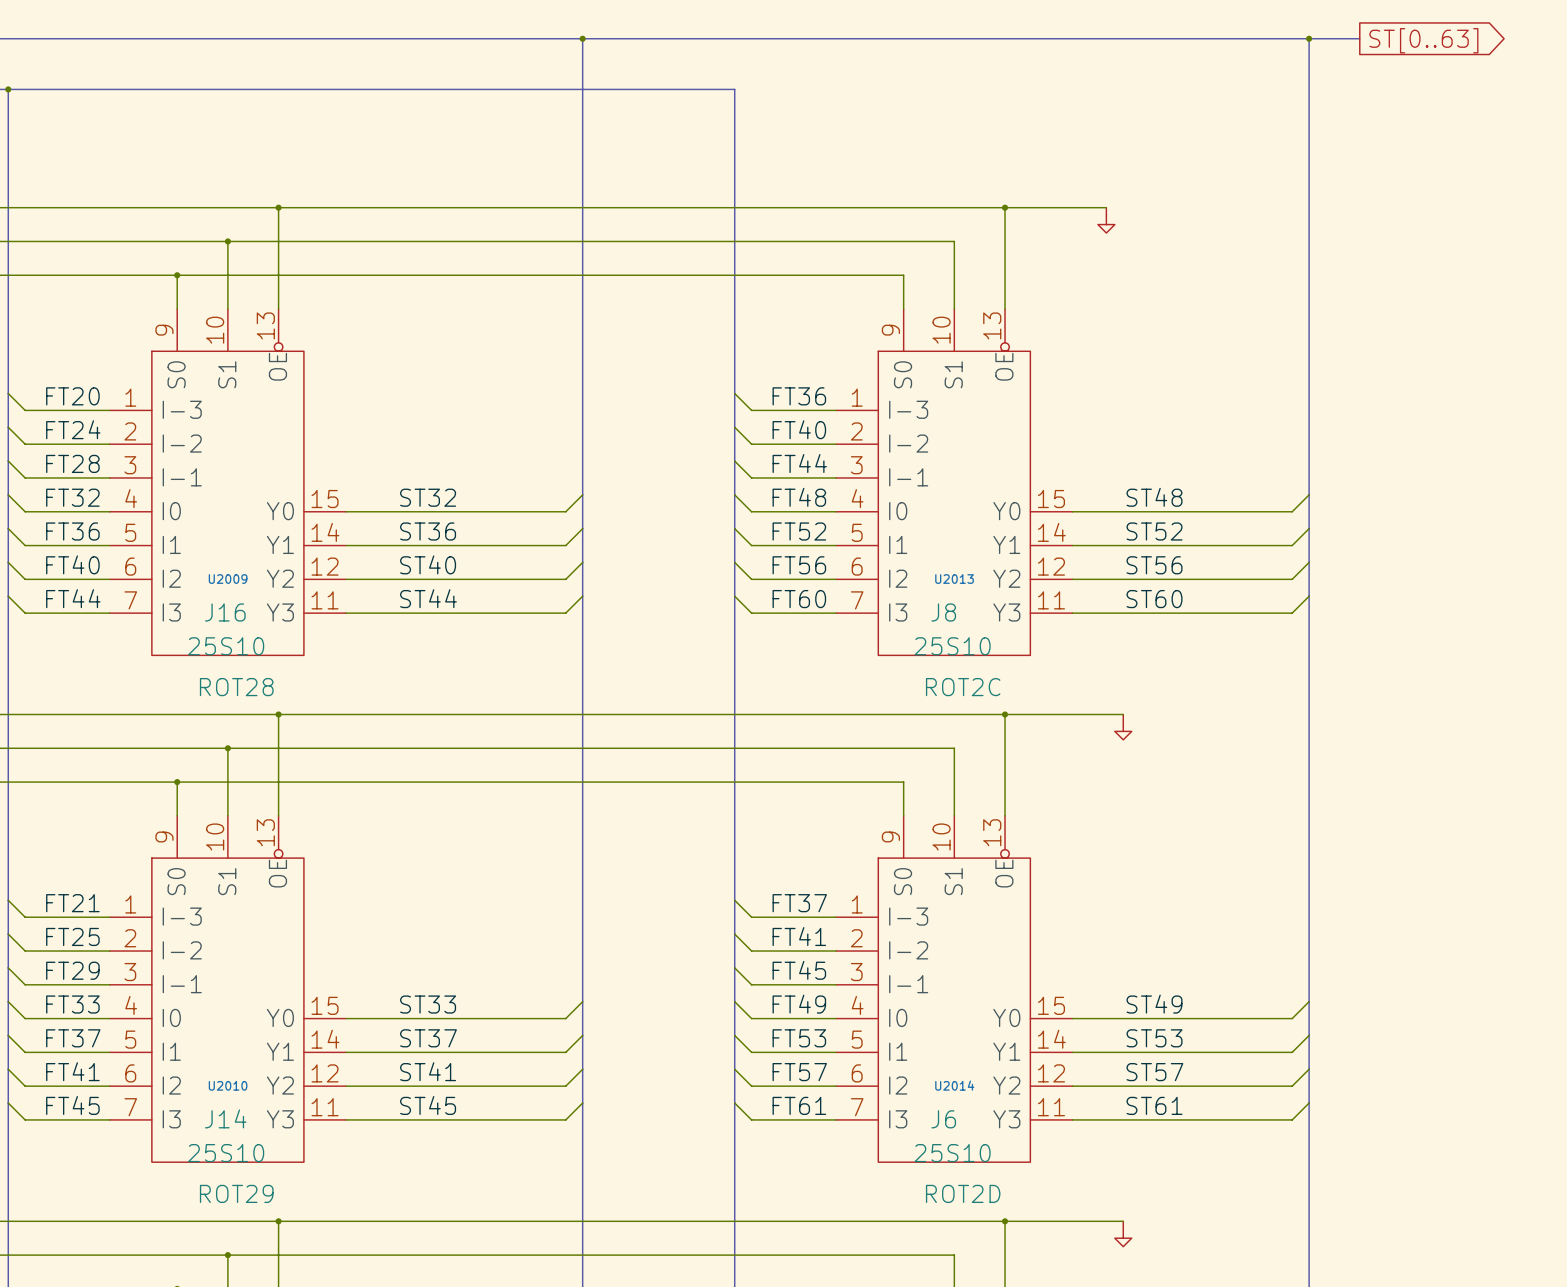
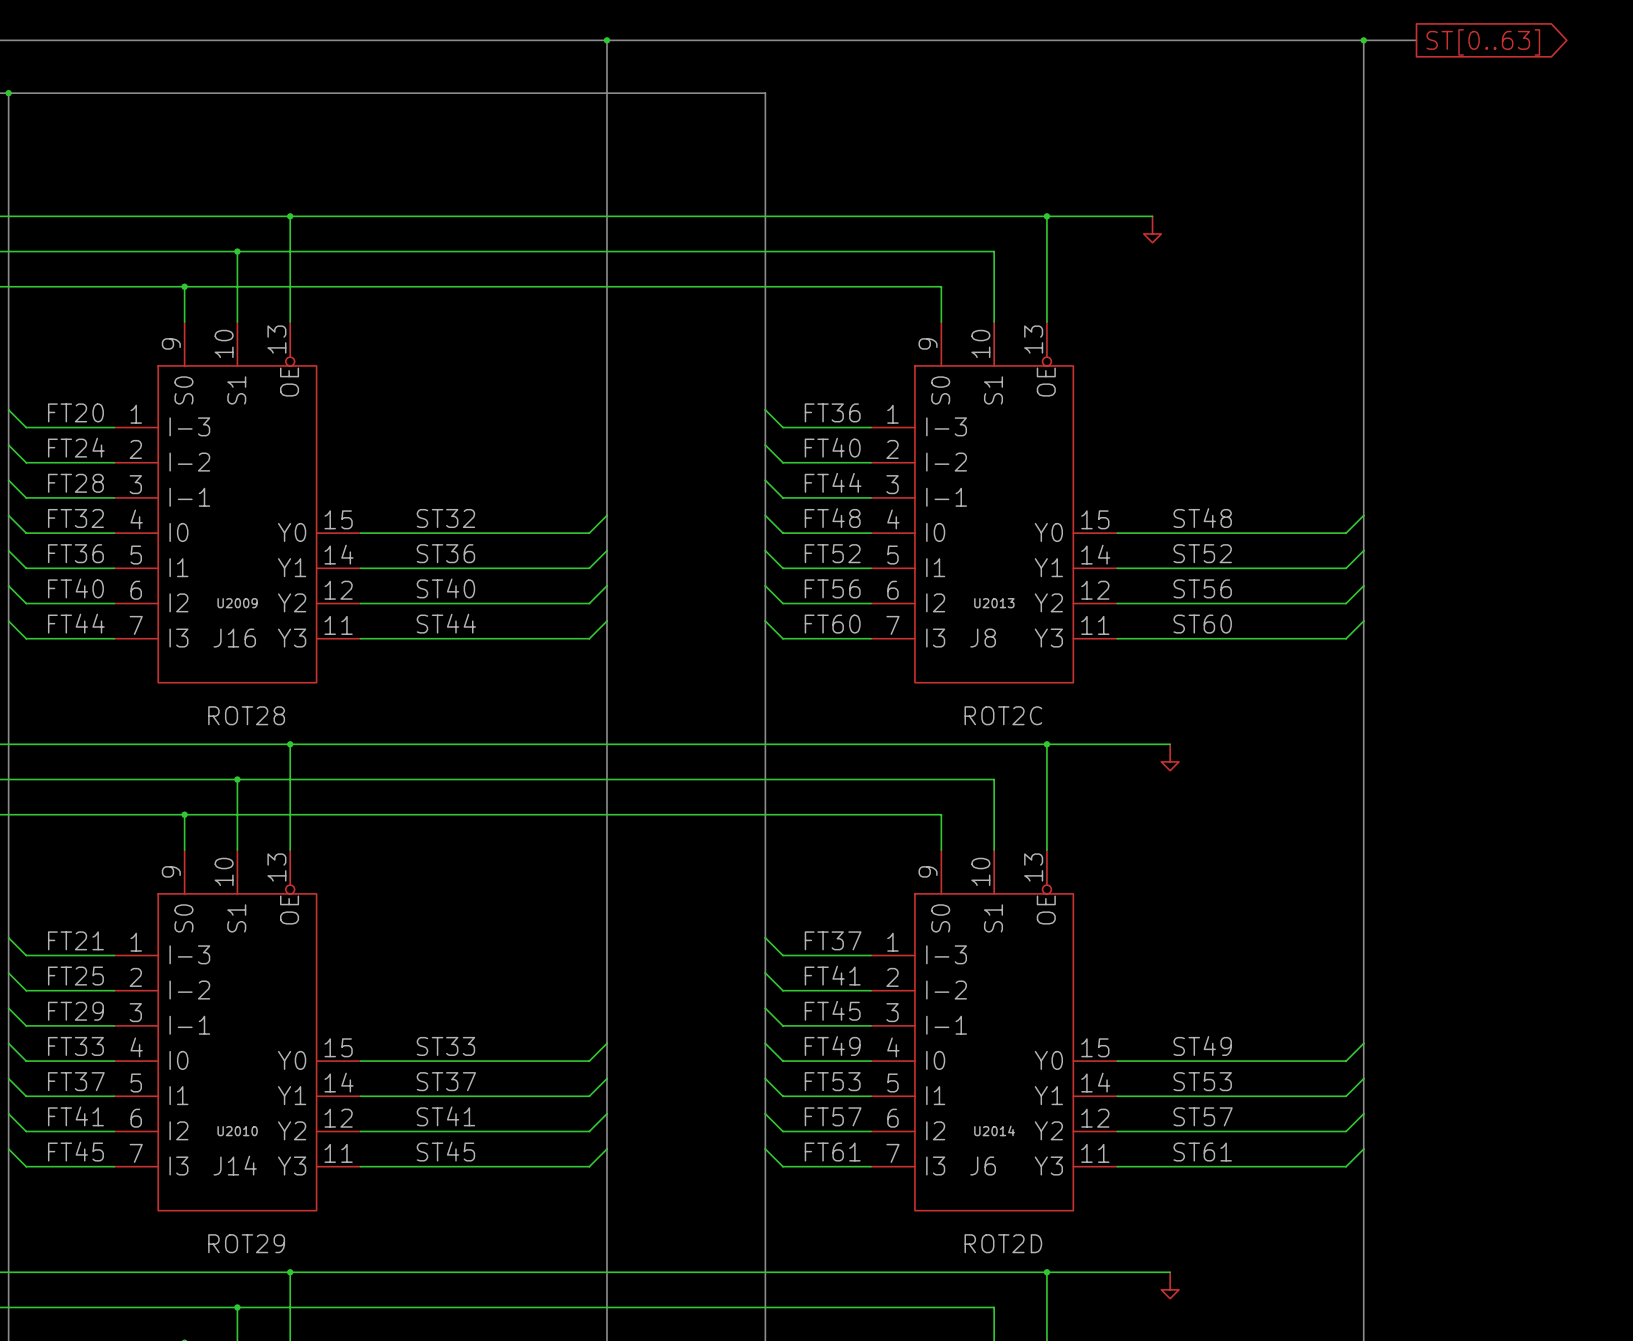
U2009 value: 25S10 (226, 646) -> none
U2013 value: 25S10 (952, 646) -> none
U2010 value: 25S10 (226, 1153) -> none
U2014 value: 25S10 (952, 1153) -> none

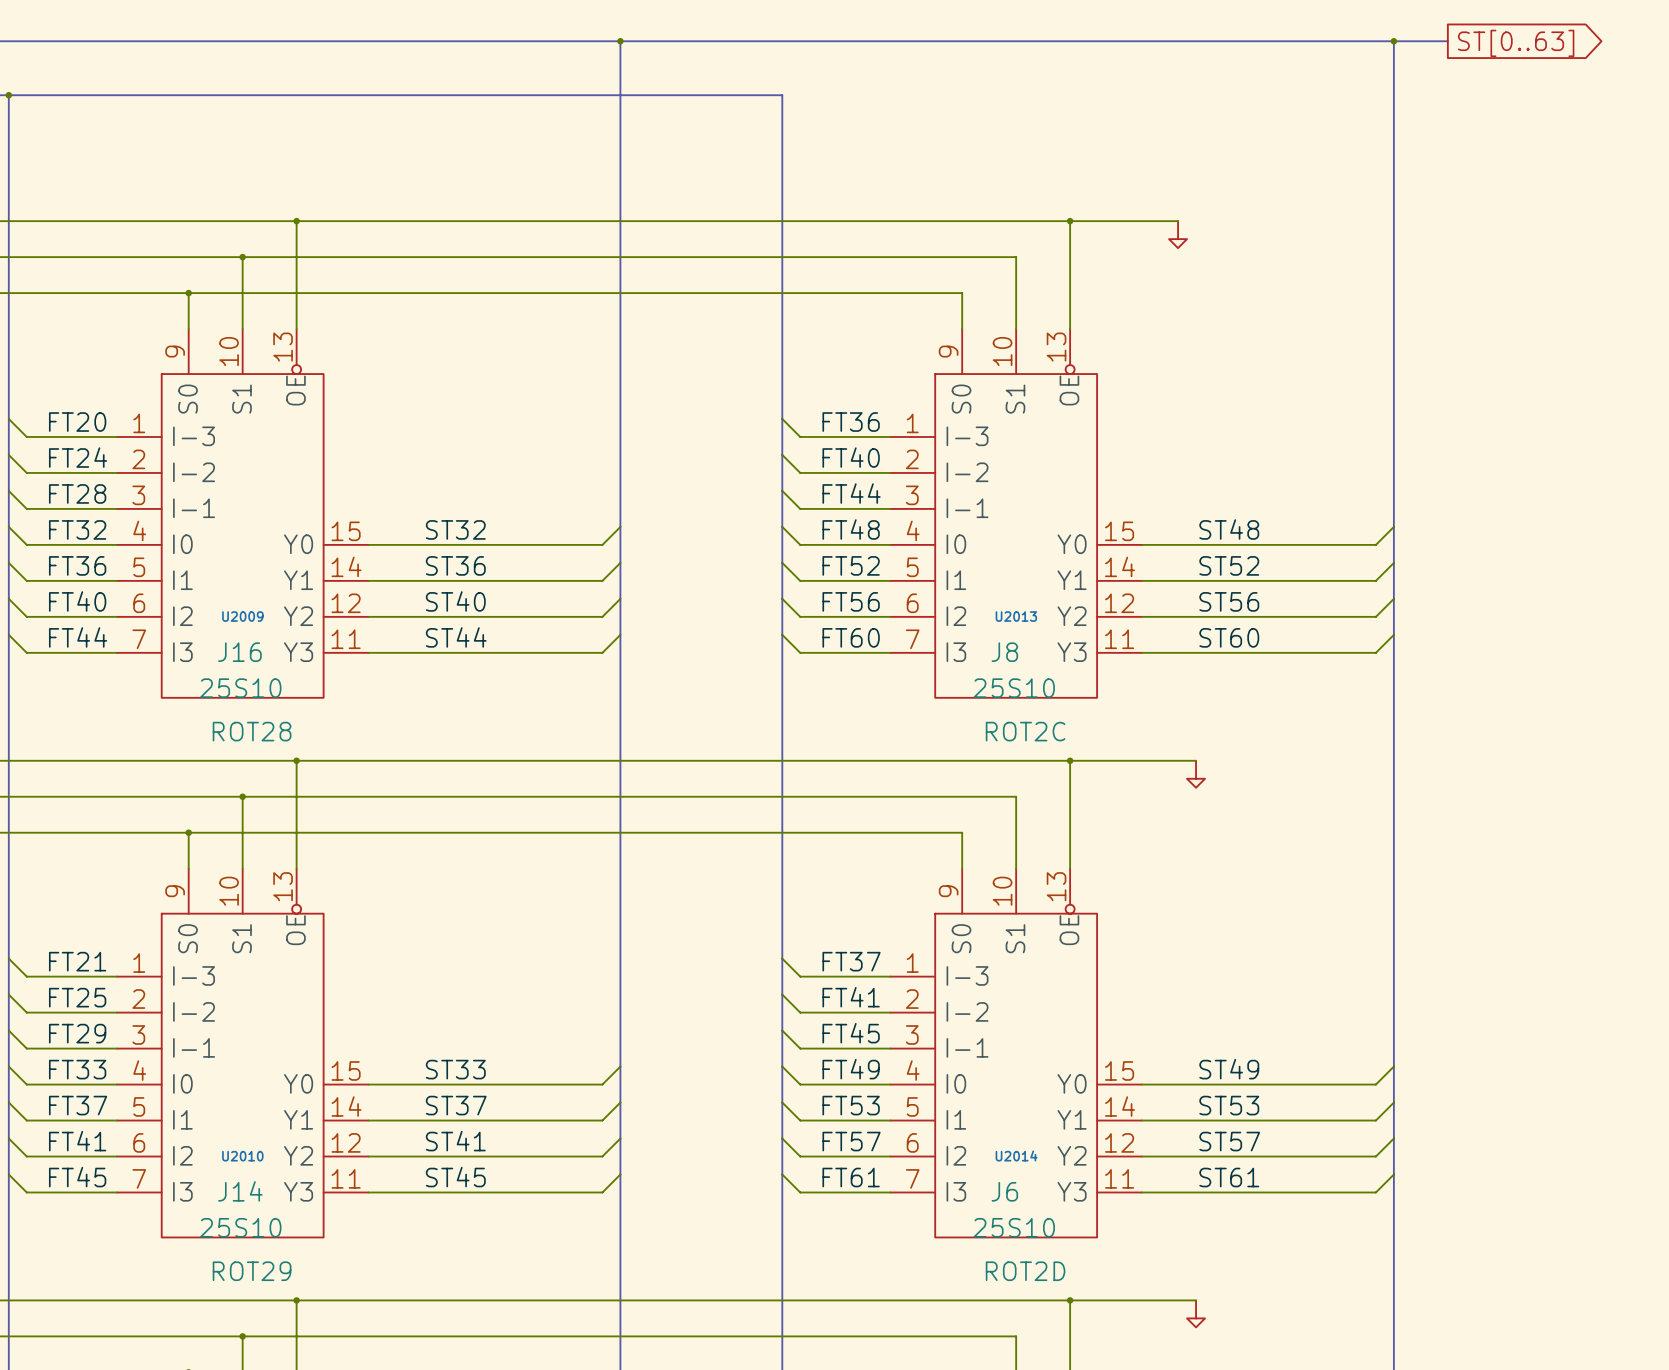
U2009 value: none -> 25S10 (240, 688)
U2013 value: none -> 25S10 (1014, 688)
U2010 value: none -> 25S10 (240, 1227)
U2014 value: none -> 25S10 (1014, 1227)

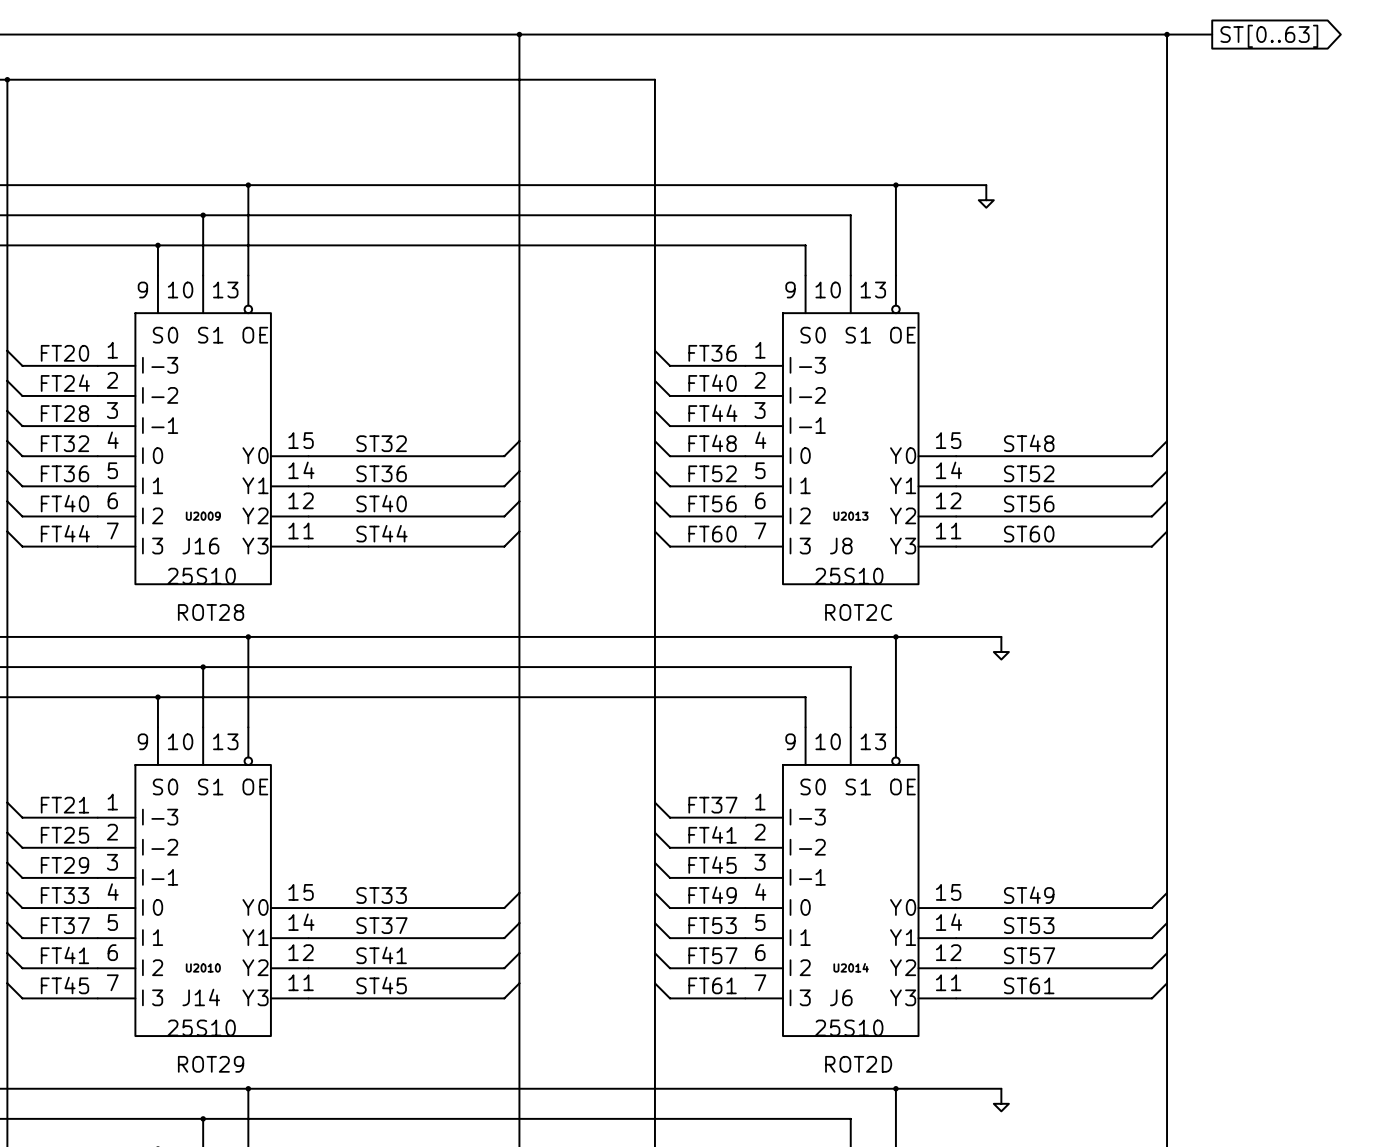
U2009 symbol: [116, 329, 369, 698] -> [97, 275, 309, 585]
U2013 symbol: [890, 329, 1143, 698] -> [745, 275, 957, 585]
U2010 symbol: [116, 868, 369, 1238] -> [97, 727, 309, 1037]
U2014 symbol: [890, 868, 1143, 1238] -> [745, 727, 957, 1037]

